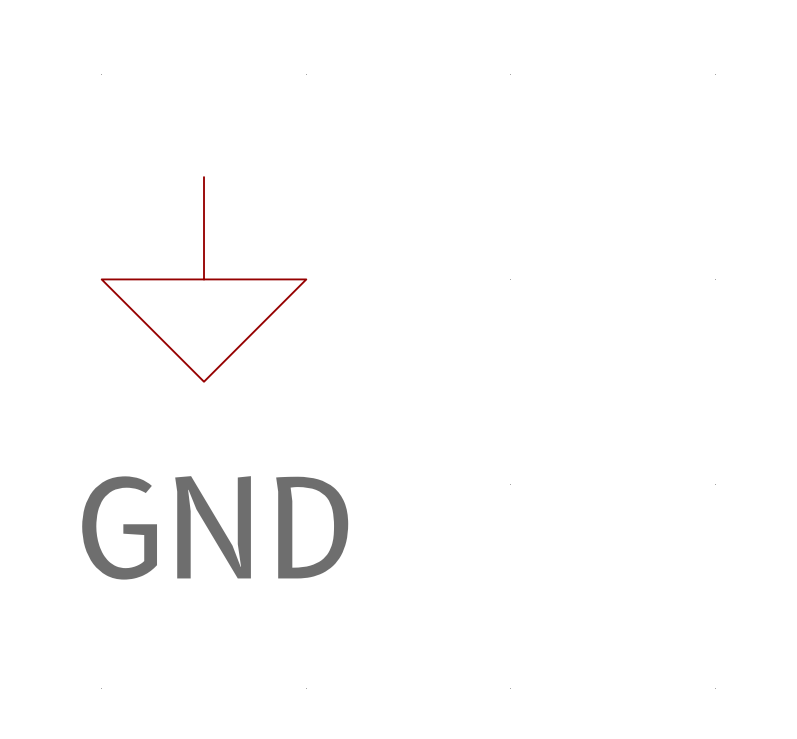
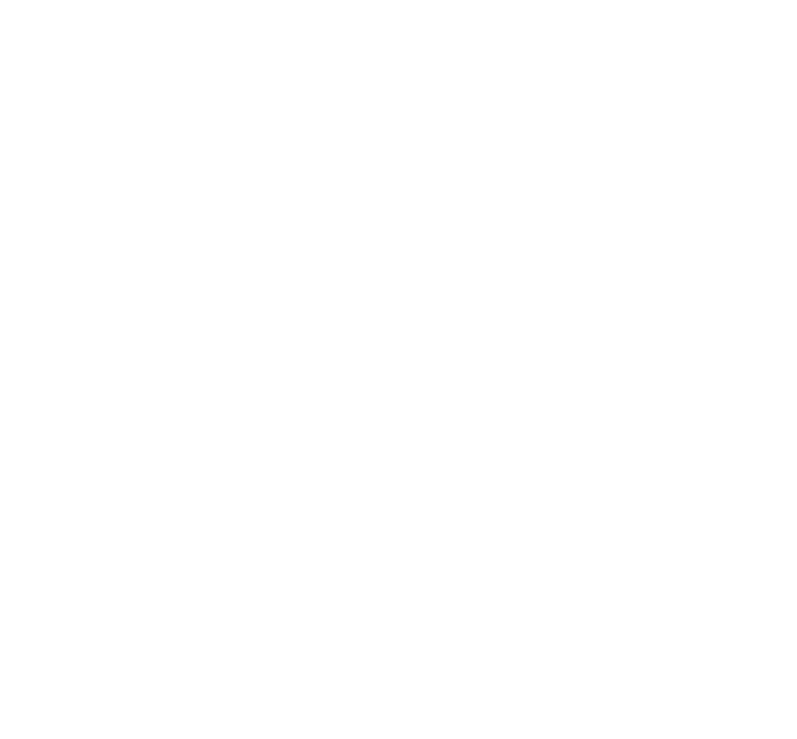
power symbol: GND (204, 279) -> none

